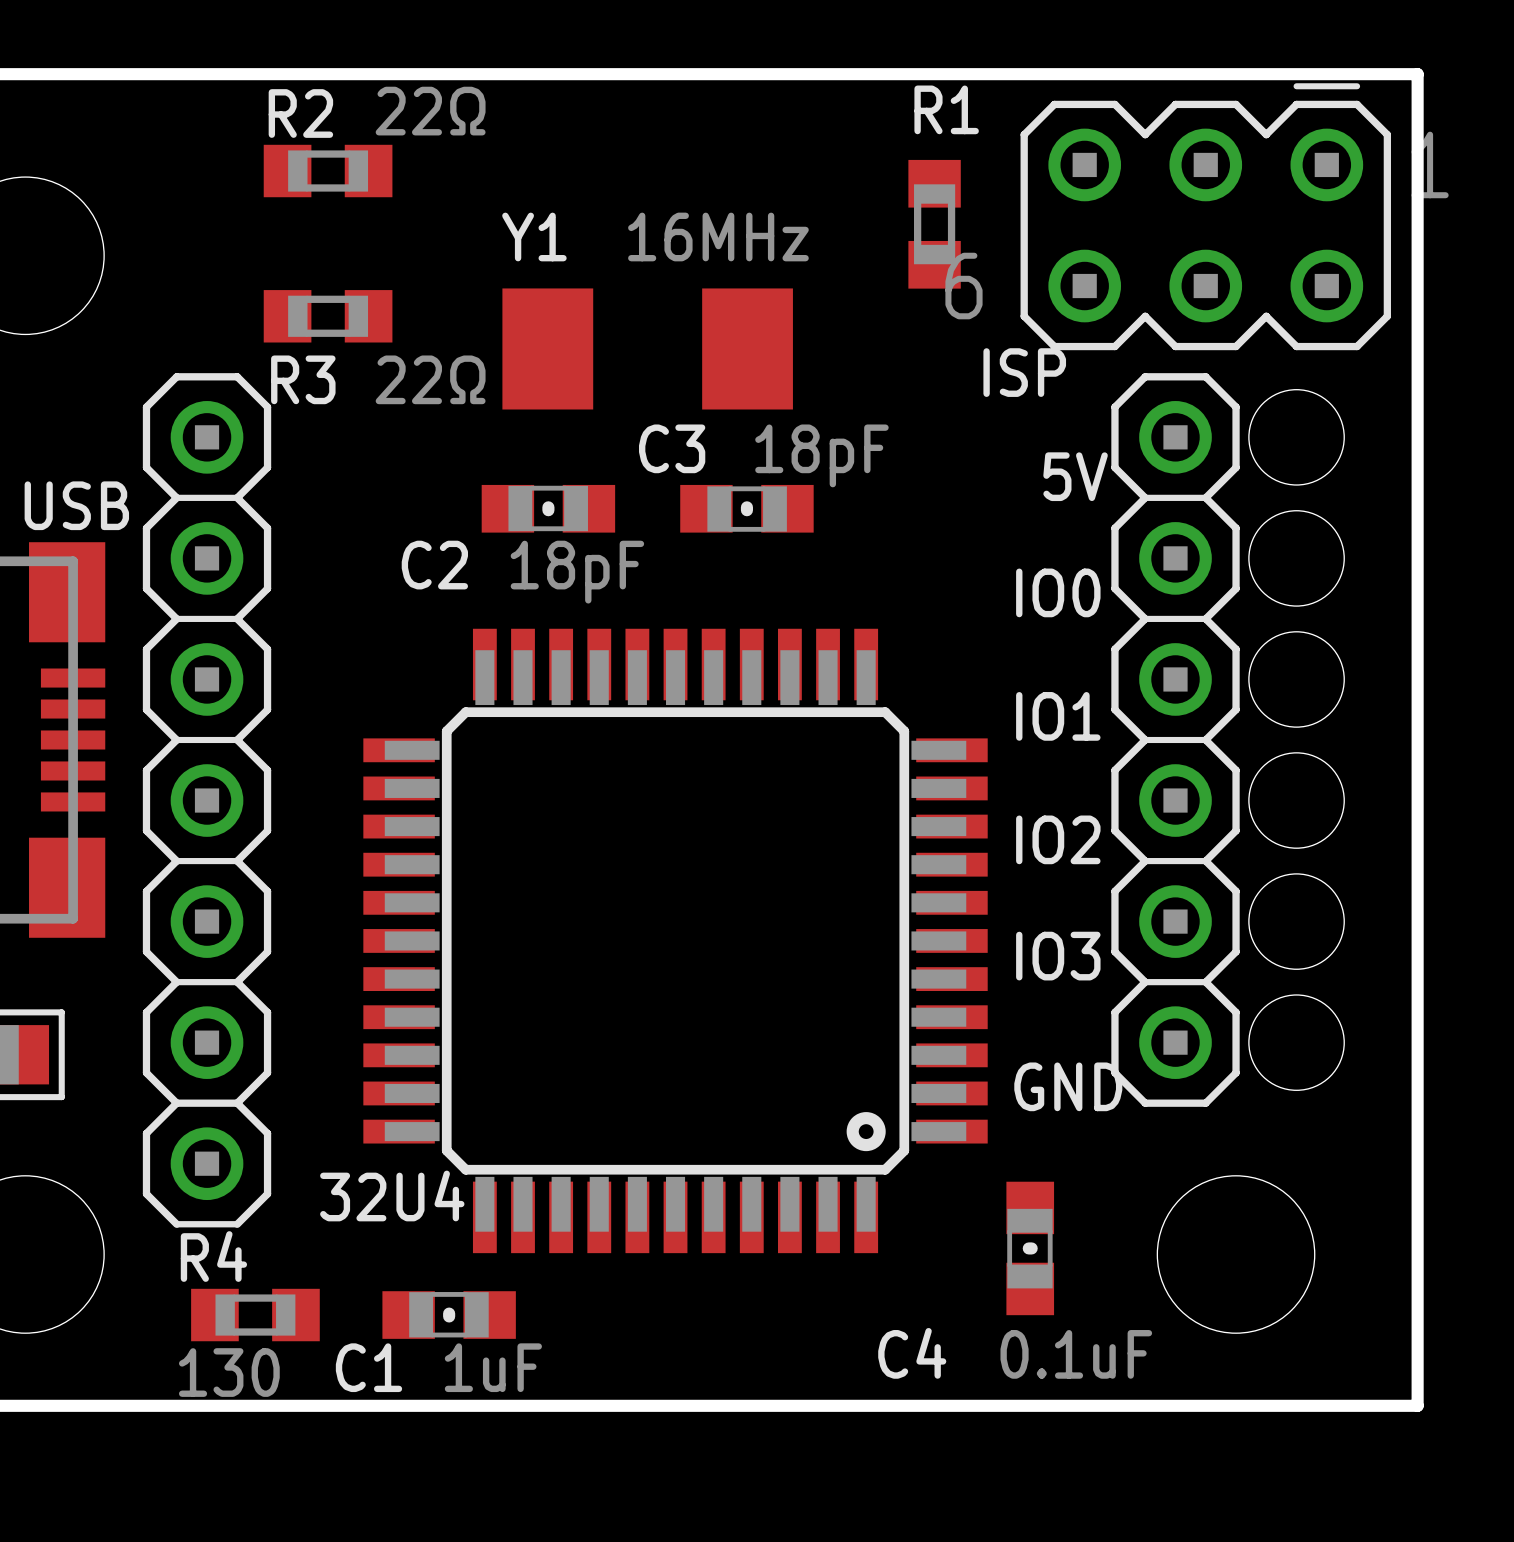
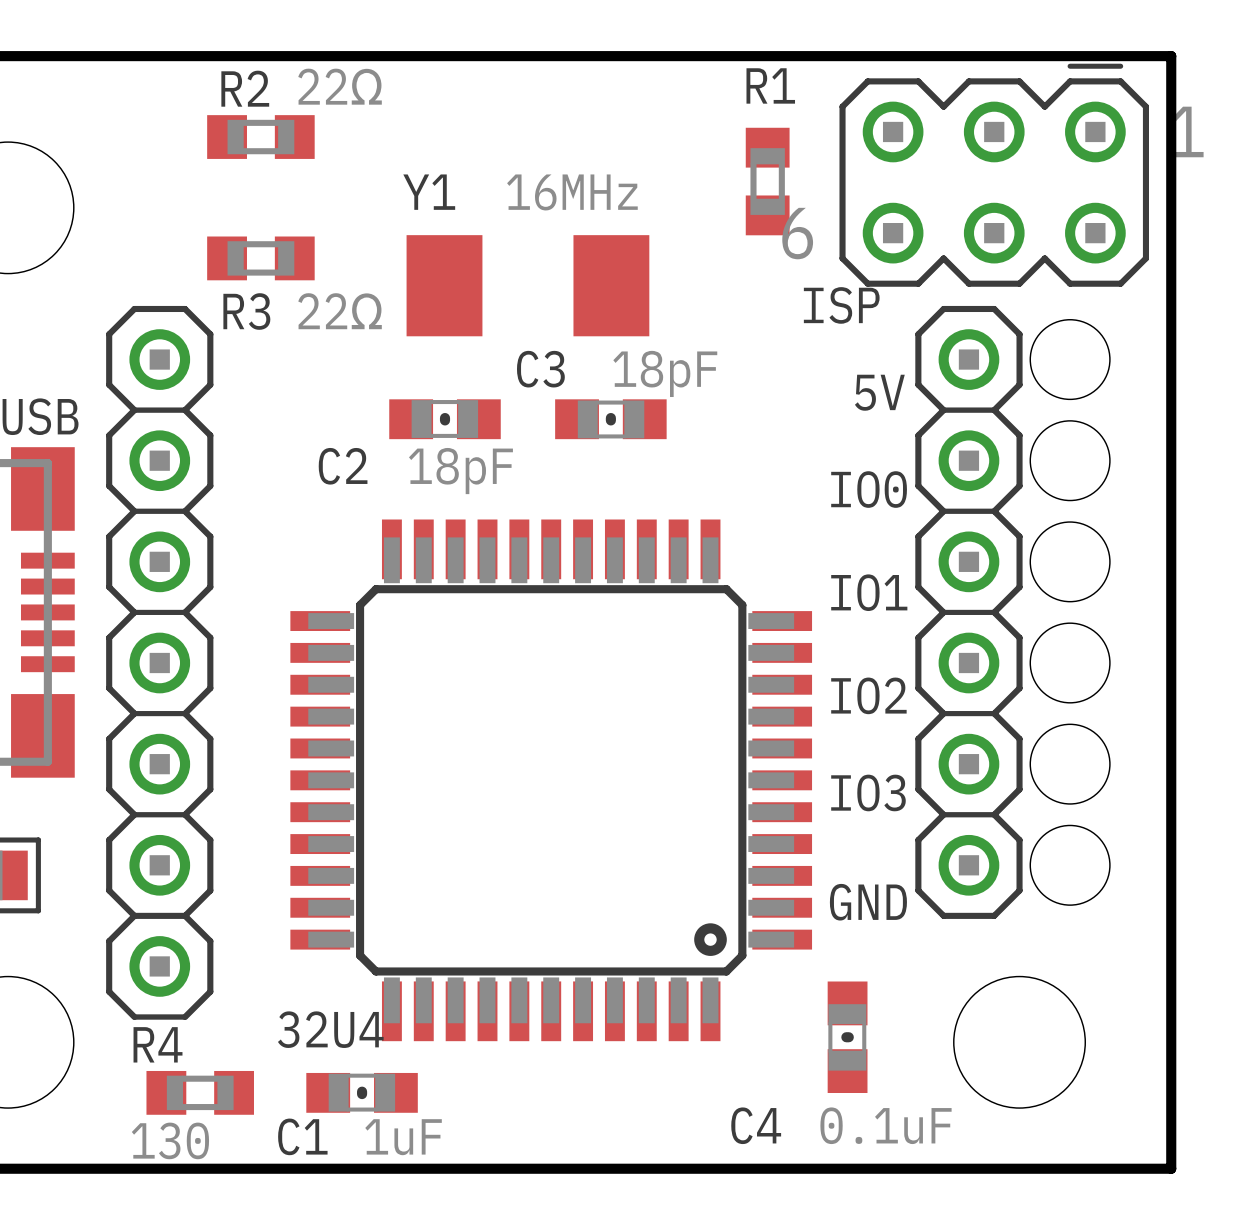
text position: 32U4 (392, 1195) -> 32U4 (330, 1029)

